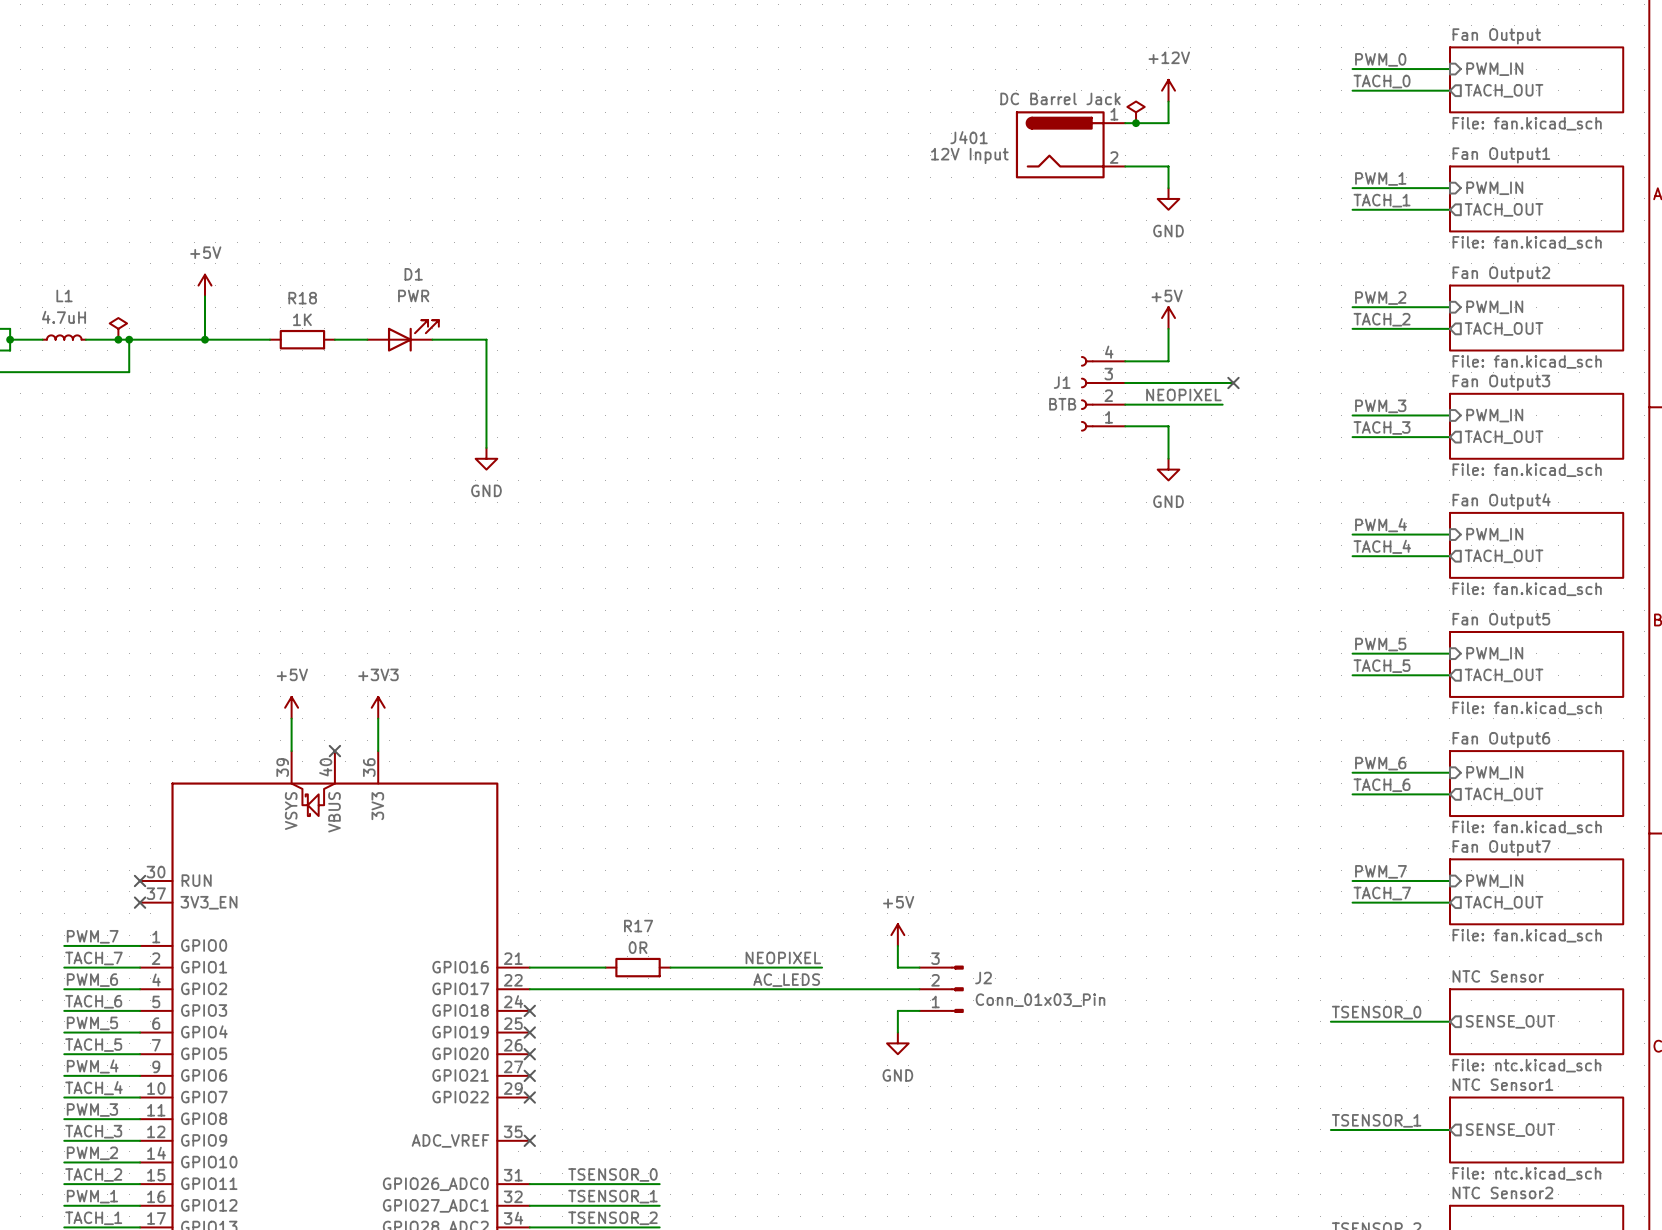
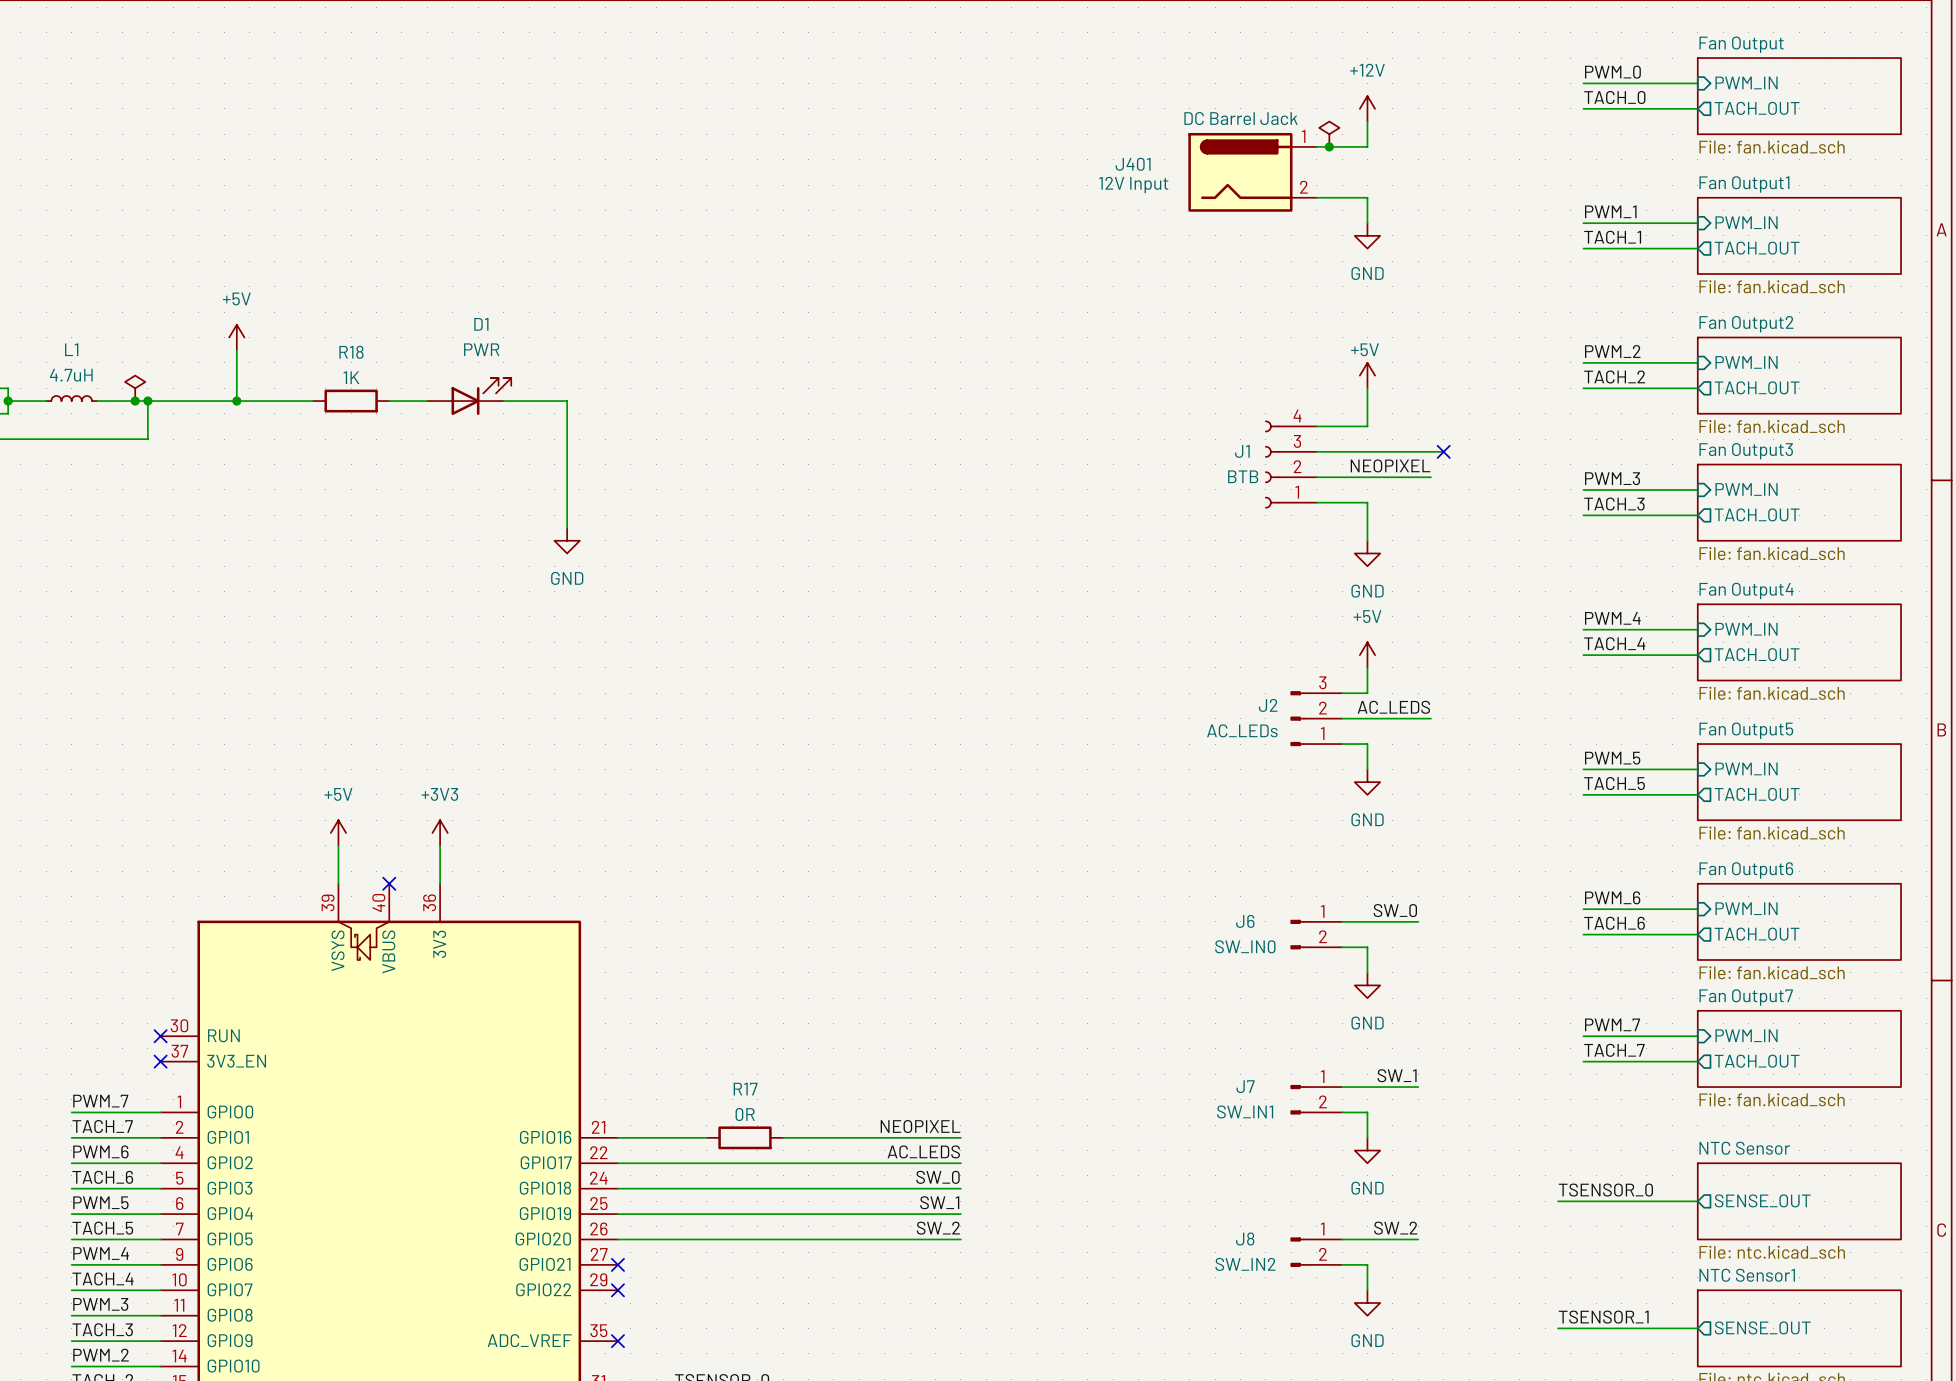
power symbol: none -> +5V (1367, 655)
wire: none -> (1367, 667) (1367, 693) (1342, 693)
label: none -> AC_LEDS (1393, 707)
wire: none -> (1342, 718) (1430, 718)
wire: none -> (1342, 744) (1367, 744) (1367, 769)
power symbol: none -> GND (1367, 782)
label: none -> SW_0 (1395, 910)
wire: none -> (1342, 921) (1418, 921)
J6: none -> SW_IN0 (1316, 934)
wire: none -> (1342, 947) (1367, 947) (1367, 972)
power symbol: none -> GND (1367, 985)
label: none -> SW_1 (1397, 1075)
wire: none -> (1342, 1087) (1418, 1087)
power symbol: +5V (897, 935) -> none
J7: none -> SW_IN1 (1316, 1099)
wire: (897, 945) (897, 967) (919, 967) -> none
wire: none -> (1342, 1112) (1367, 1112) (1367, 1137)
power symbol: none -> GND (1367, 1150)
wire: (822, 989) (919, 989) -> none
J2 position: (941, 989) -> (1316, 718)
J2 flip: as is (957, 989) -> left-right (1297, 718)
J2 value: Conn_01x03_Pin (1040, 1000) -> AC_LEDs (1242, 730)
label: none -> SW_0 (937, 1177)
wire: none -> (617, 1188) (960, 1188)
no-connect mark: (529, 1010) -> none
wire: (919, 1010) (897, 1010) (897, 1032) -> none
label: none -> SW_1 (939, 1202)
wire: none -> (617, 1214) (960, 1214)
no-connect mark: (529, 1032) -> none
power symbol: GND (897, 1043) -> none
label: none -> SW_2 (938, 1228)
label: none -> SW_2 (1395, 1228)
wire: none -> (617, 1239) (960, 1239)
no-connect mark: (529, 1054) -> none
wire: none -> (1342, 1239) (1418, 1239)
J8: none -> SW_IN2 (1316, 1252)
wire: none -> (1342, 1264) (1367, 1264) (1367, 1290)
power symbol: none -> GND (1367, 1303)

